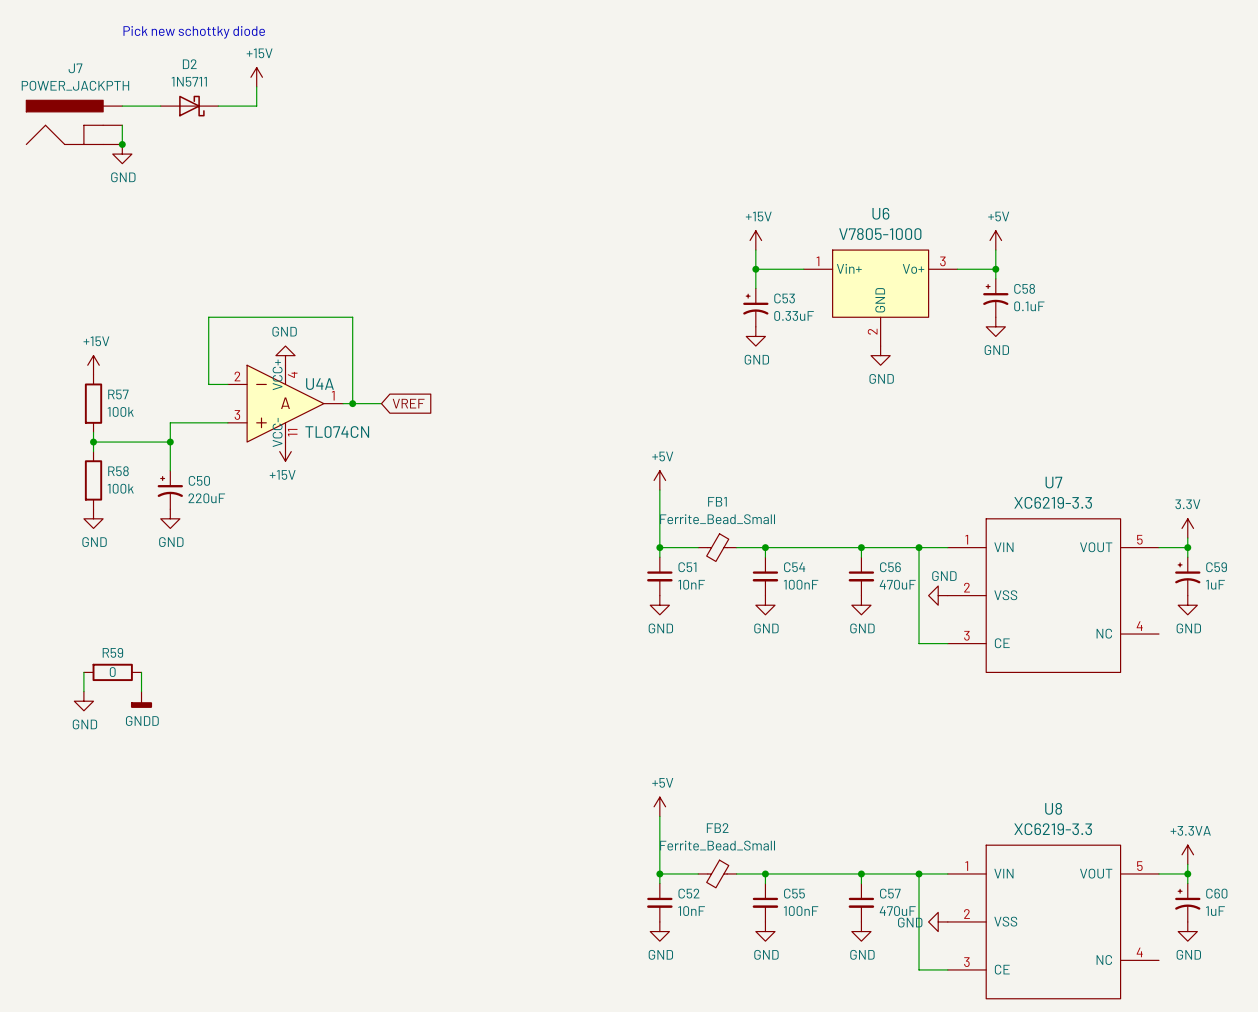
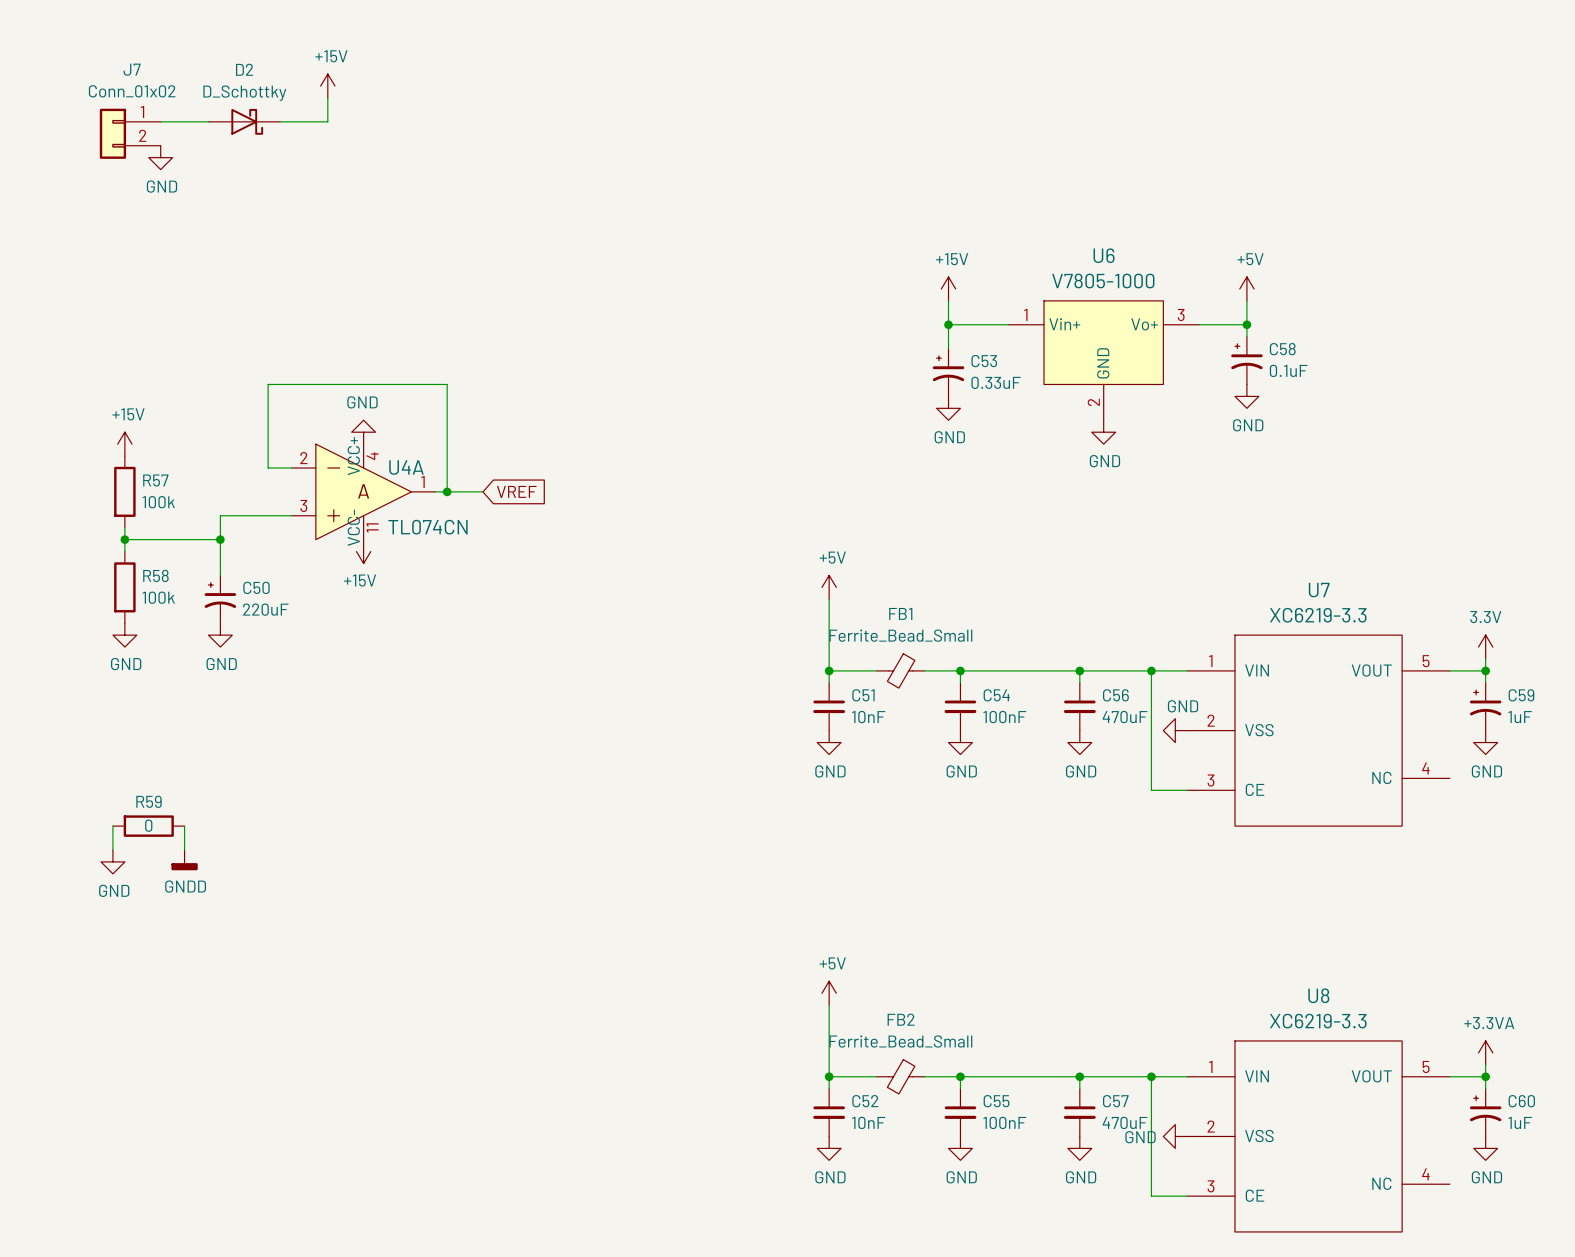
text: Pick new schottky diode (194, 32) -> none
D2 value: 1N5711 (189, 81) -> D_Schottky (244, 93)
J7 value: POWER_JACKPTH (75, 85) -> Conn_01x02 (132, 91)
J7 symbol: [26, 100, 123, 145] -> [99, 108, 161, 159]
junction: (122, 144) -> none
power symbol position: GND (122, 154) -> GND (160, 157)

